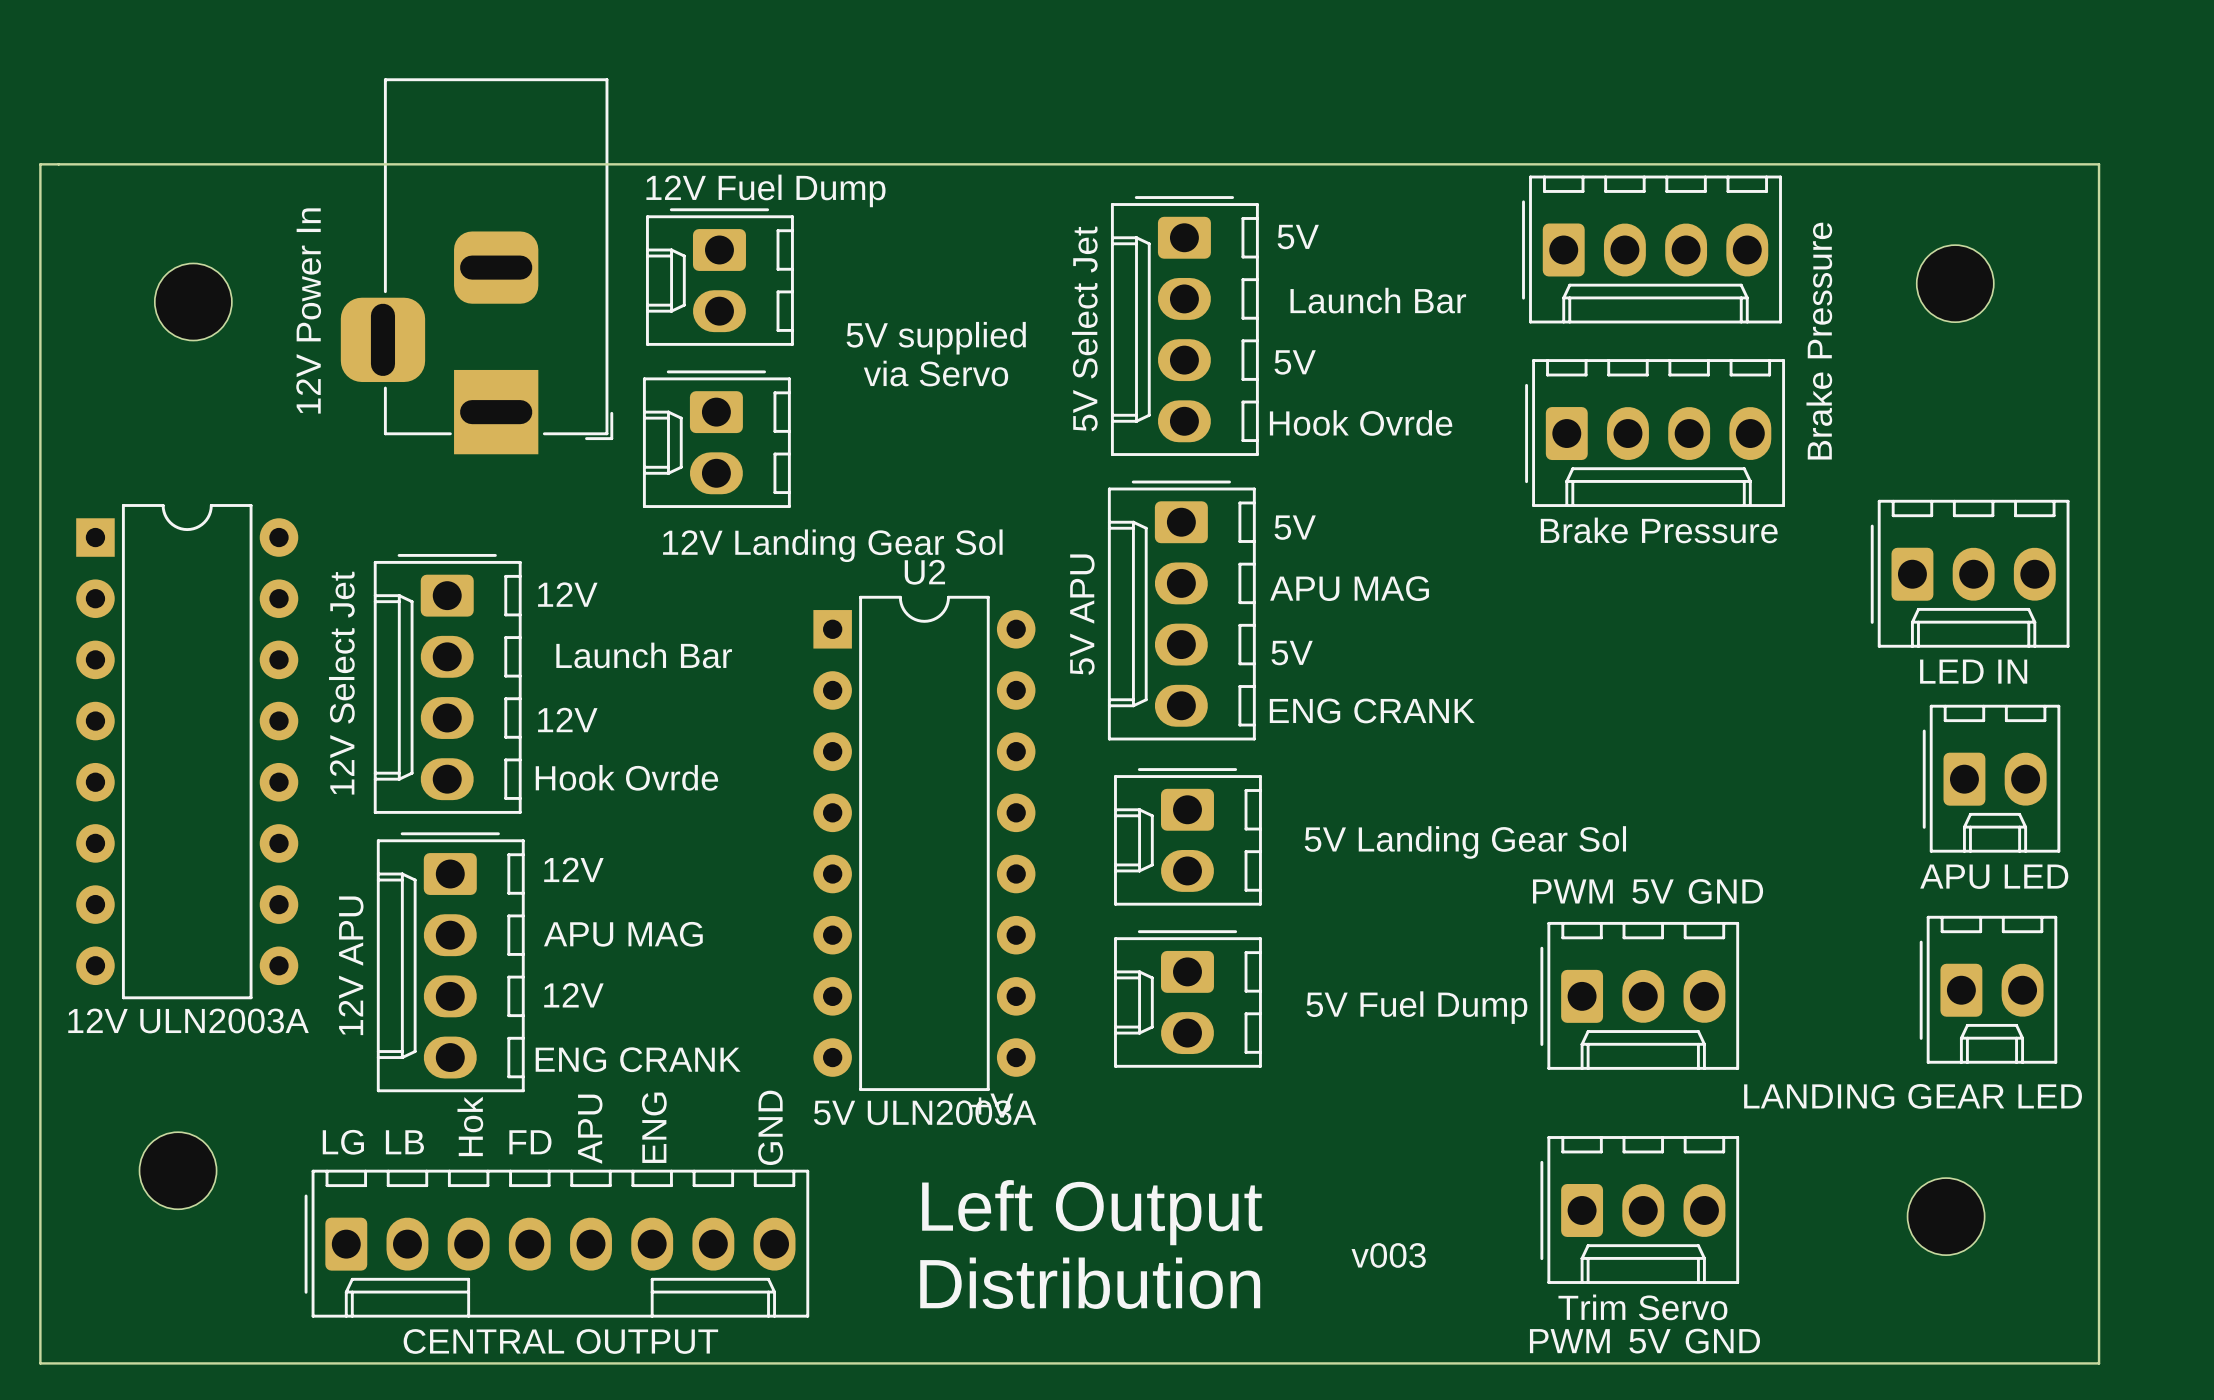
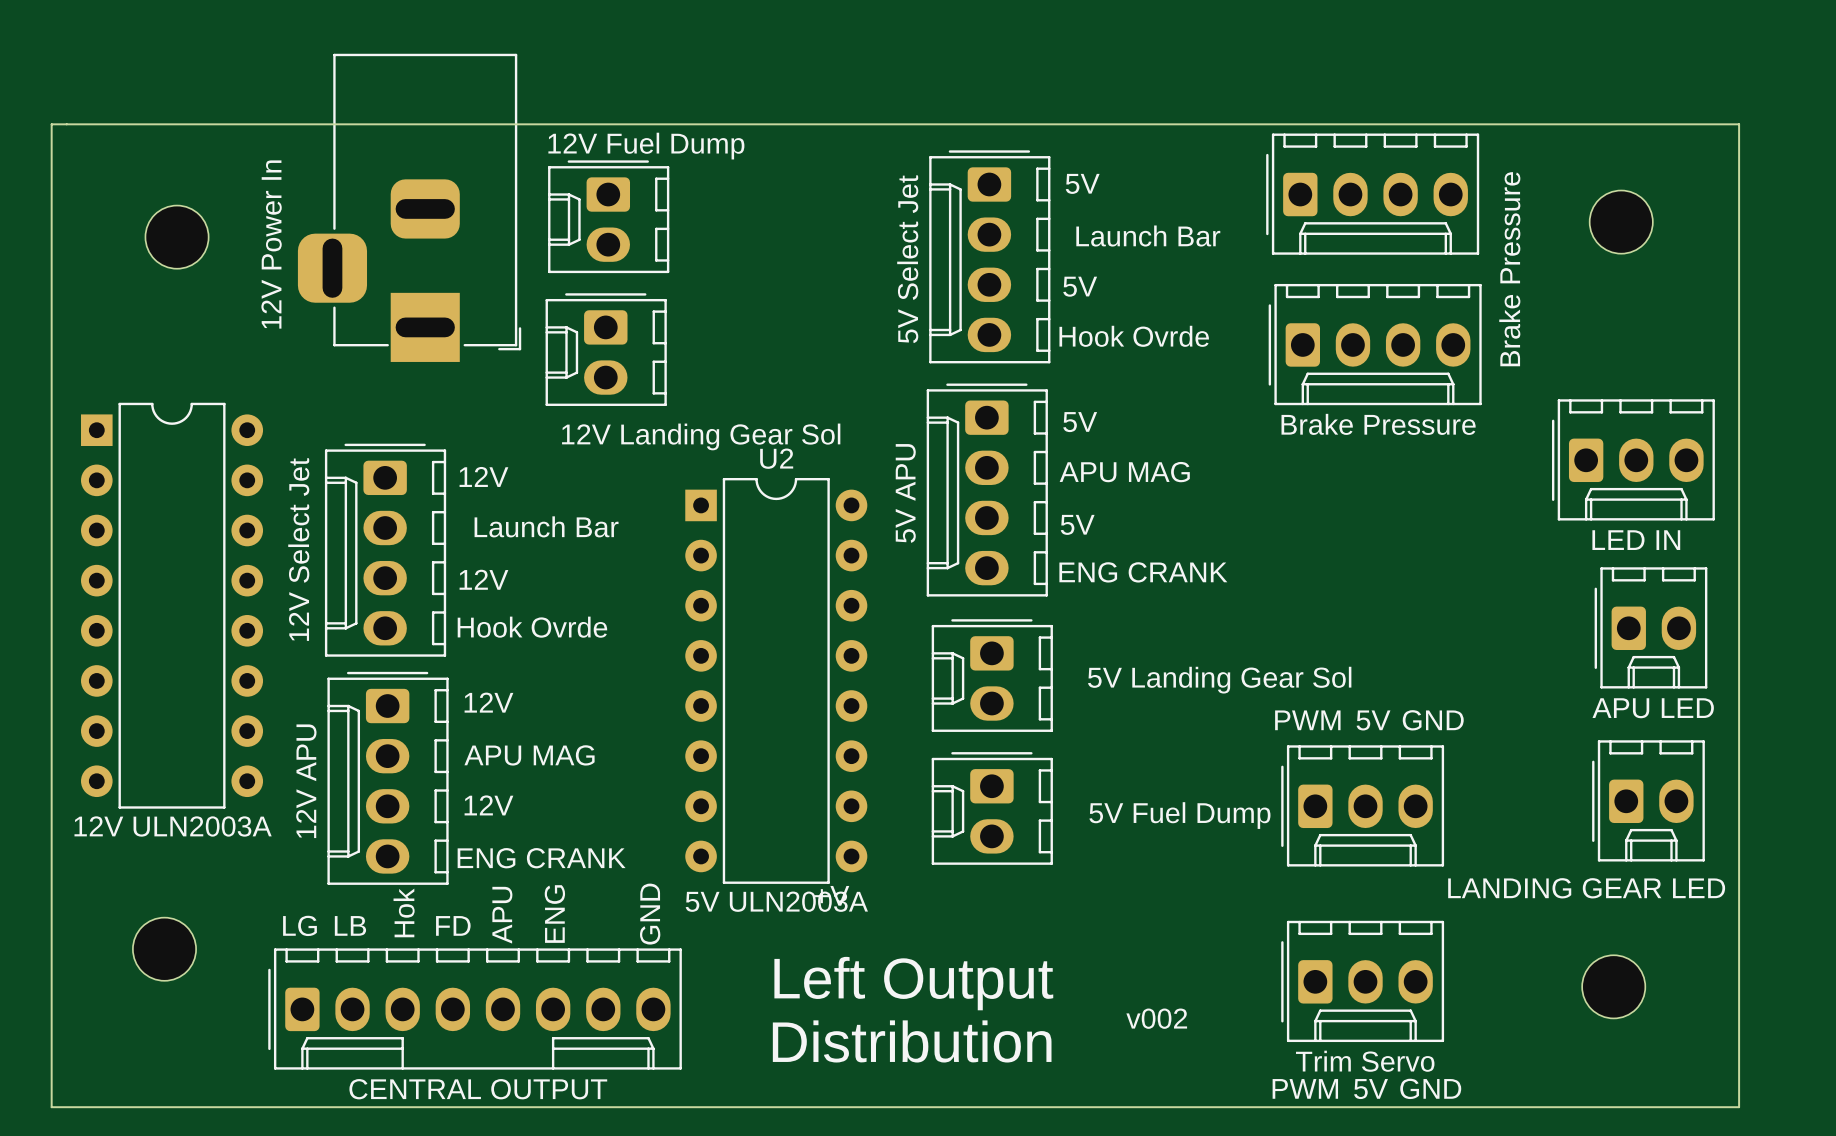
text: 5V supplied (936, 338) -> none
text: via Servo (935, 373) -> none
text: v003 (1388, 1255) -> v002 (1156, 1018)

